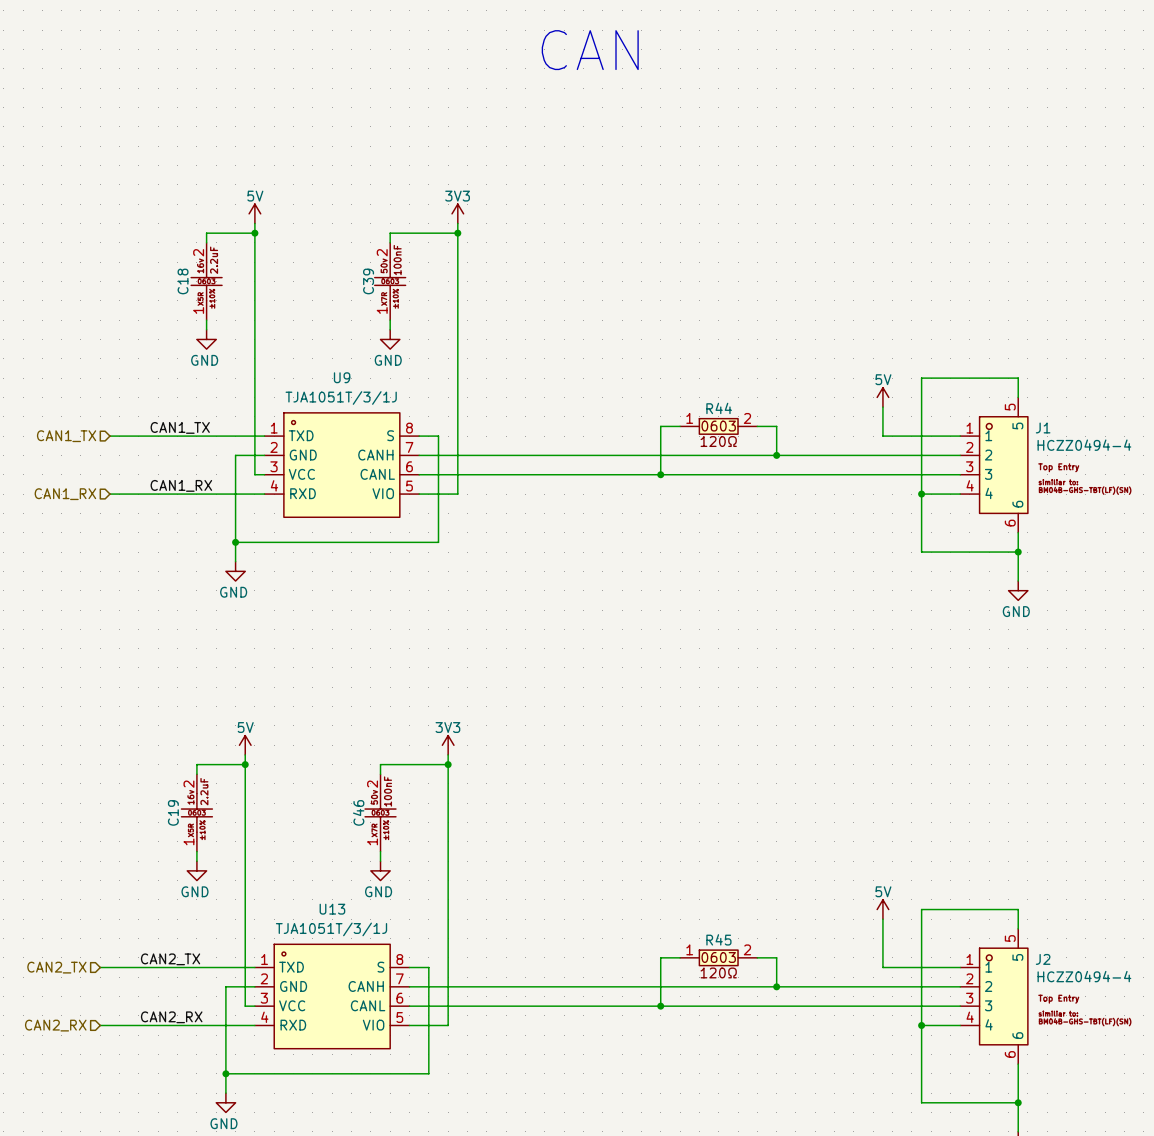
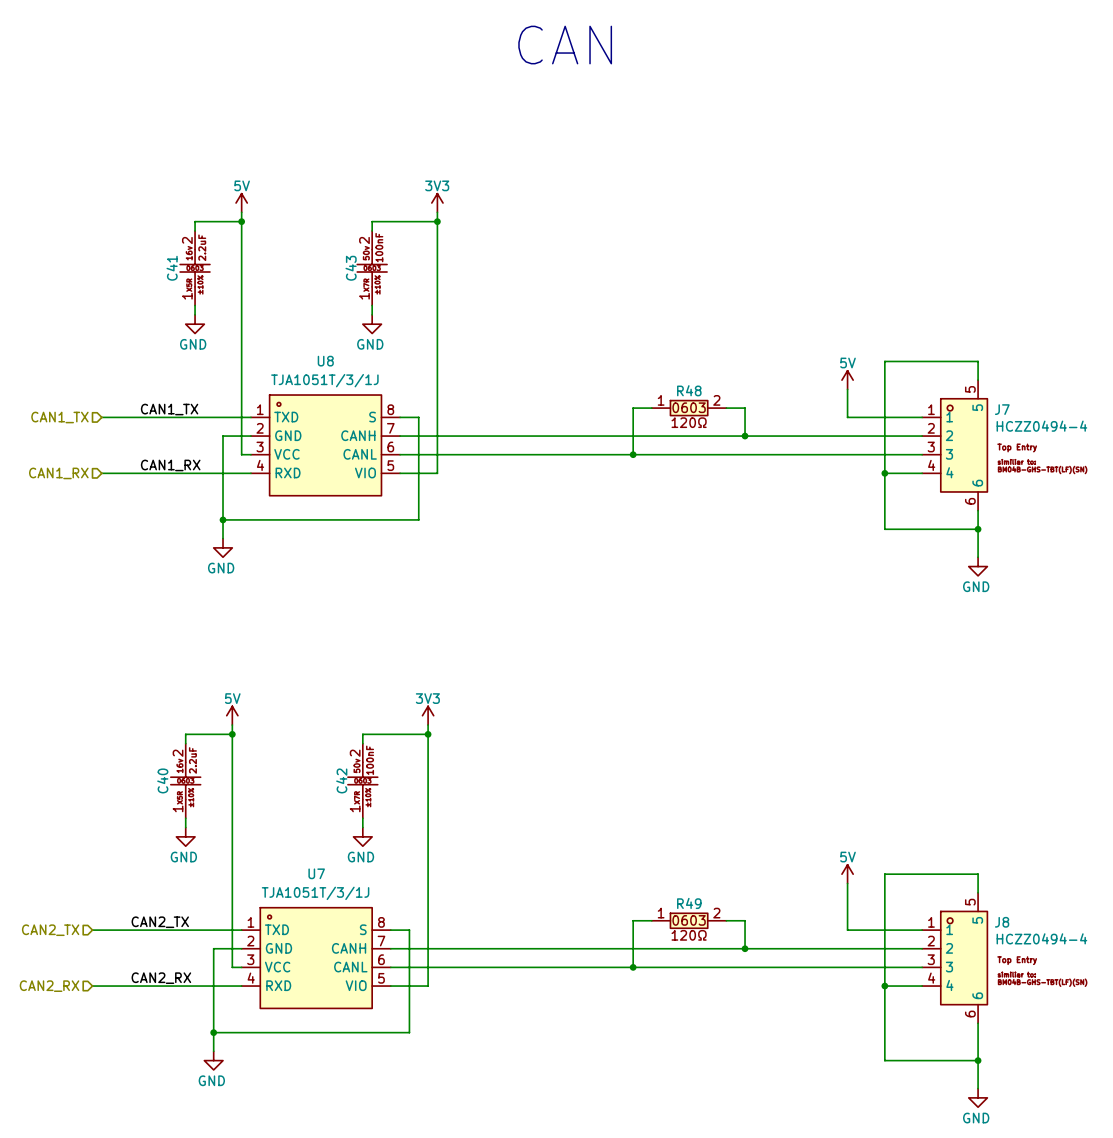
C18 name: C18 (183, 281) -> C41 (172, 268)
C39 name: C39 (368, 281) -> C43 (351, 268)
U9 name: U9 (342, 377) -> U8 (325, 361)
R44 name: R44 (719, 408) -> R48 (689, 390)
J1 name: J1 (1043, 427) -> J7 (1002, 409)
C19 name: C19 (173, 812) -> C40 (162, 780)
C46 name: C46 (358, 812) -> C42 (341, 780)
U13 name: U13 (332, 909) -> U7 (316, 873)
R45 name: R45 (718, 939) -> R49 (689, 903)
J2 name: J2 (1043, 959) -> J8 (1002, 922)

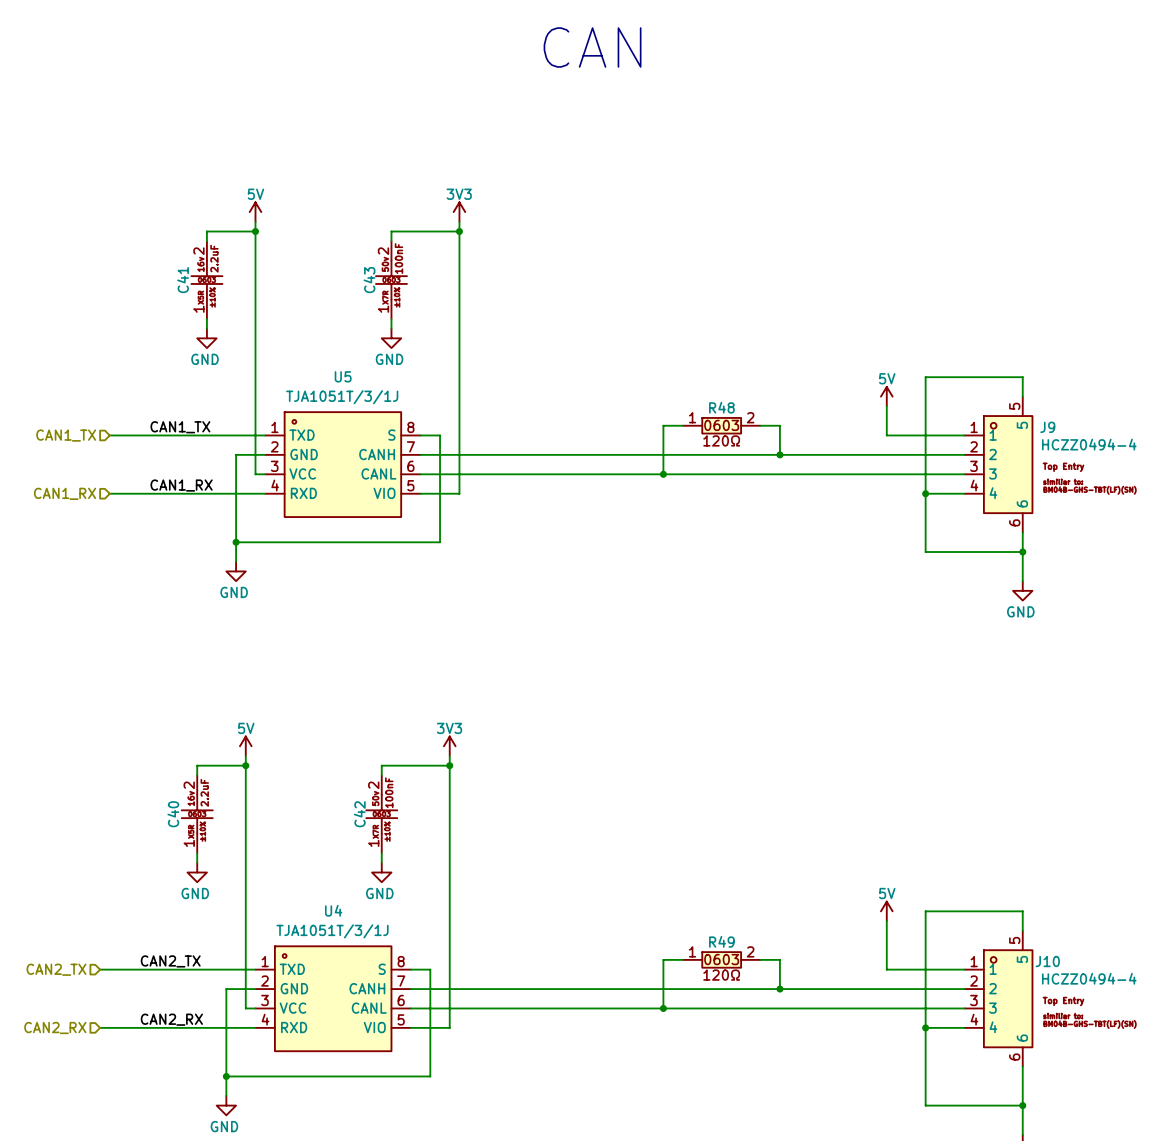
U8 name: U8 (325, 361) -> U5 (343, 376)
J7 name: J7 (1002, 409) -> J9 (1047, 427)
U7 name: U7 (316, 873) -> U4 (333, 910)
J8 name: J8 (1002, 922) -> J10 (1047, 961)

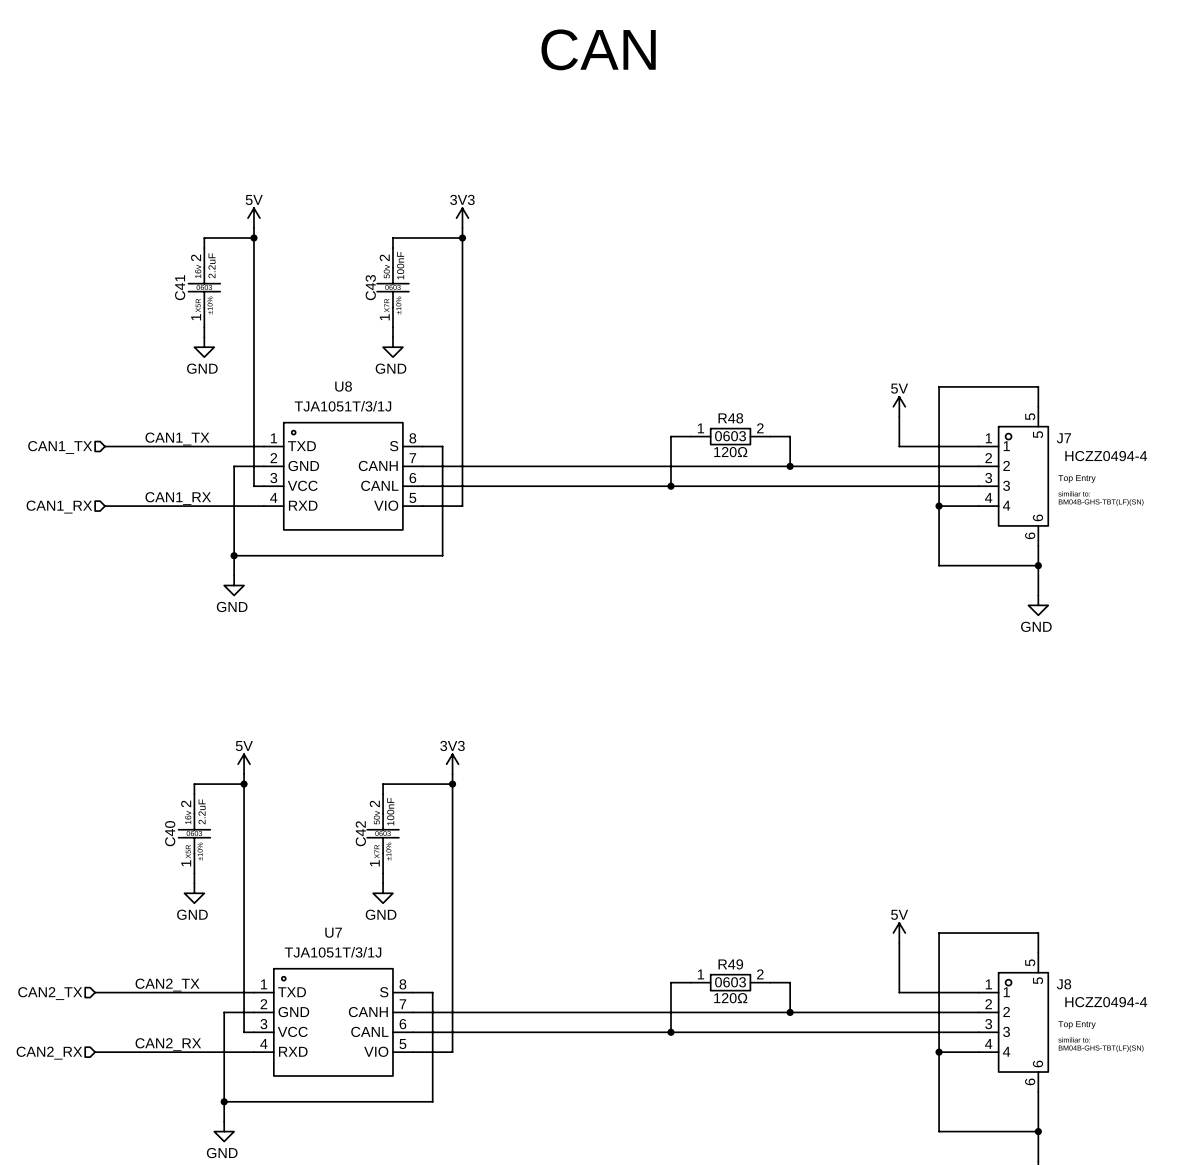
U5 name: U5 (343, 376) -> U8 (343, 386)
J9 name: J9 (1047, 427) -> J7 (1063, 438)
U4 name: U4 (333, 910) -> U7 (333, 932)
J10 name: J10 (1047, 961) -> J8 (1063, 984)

